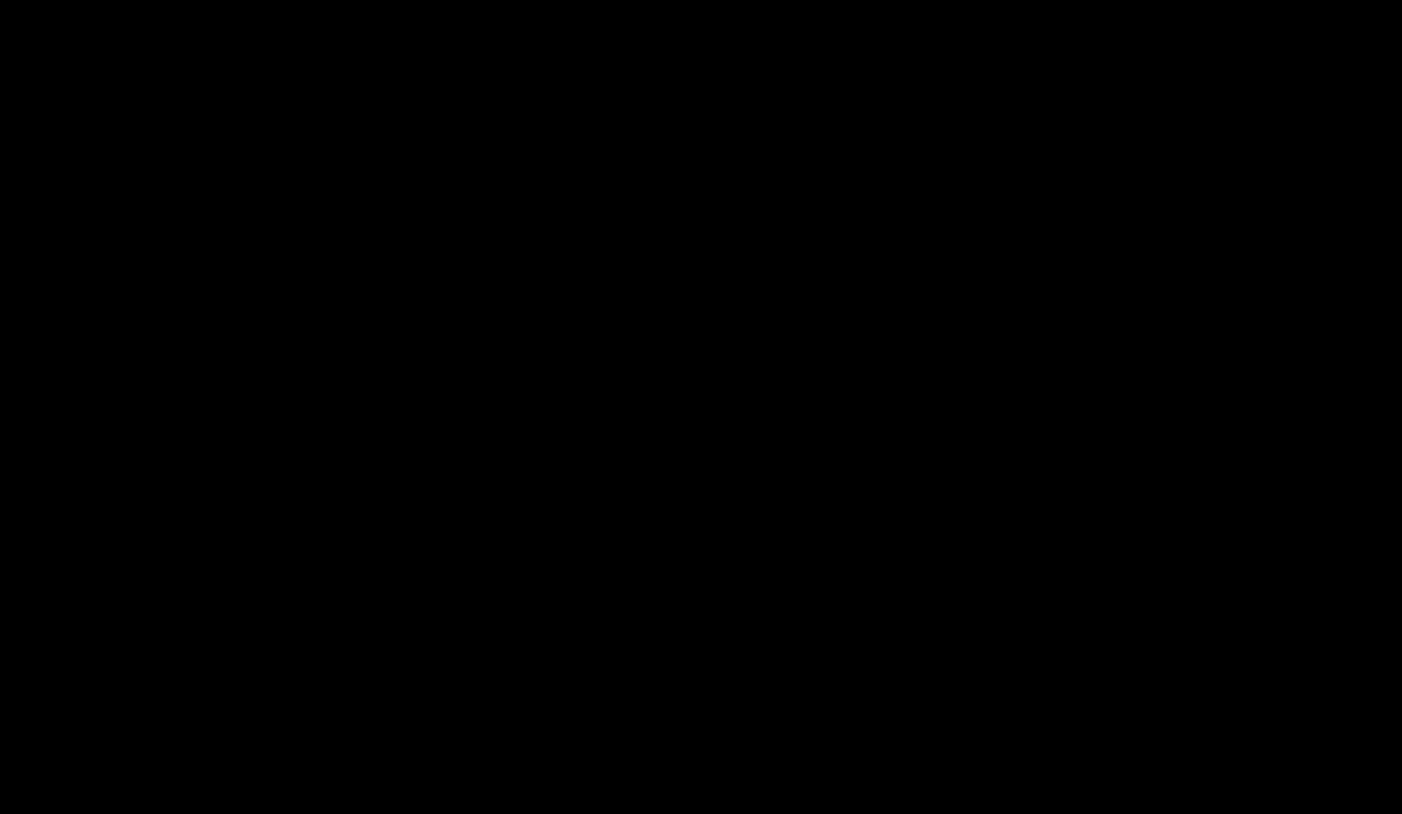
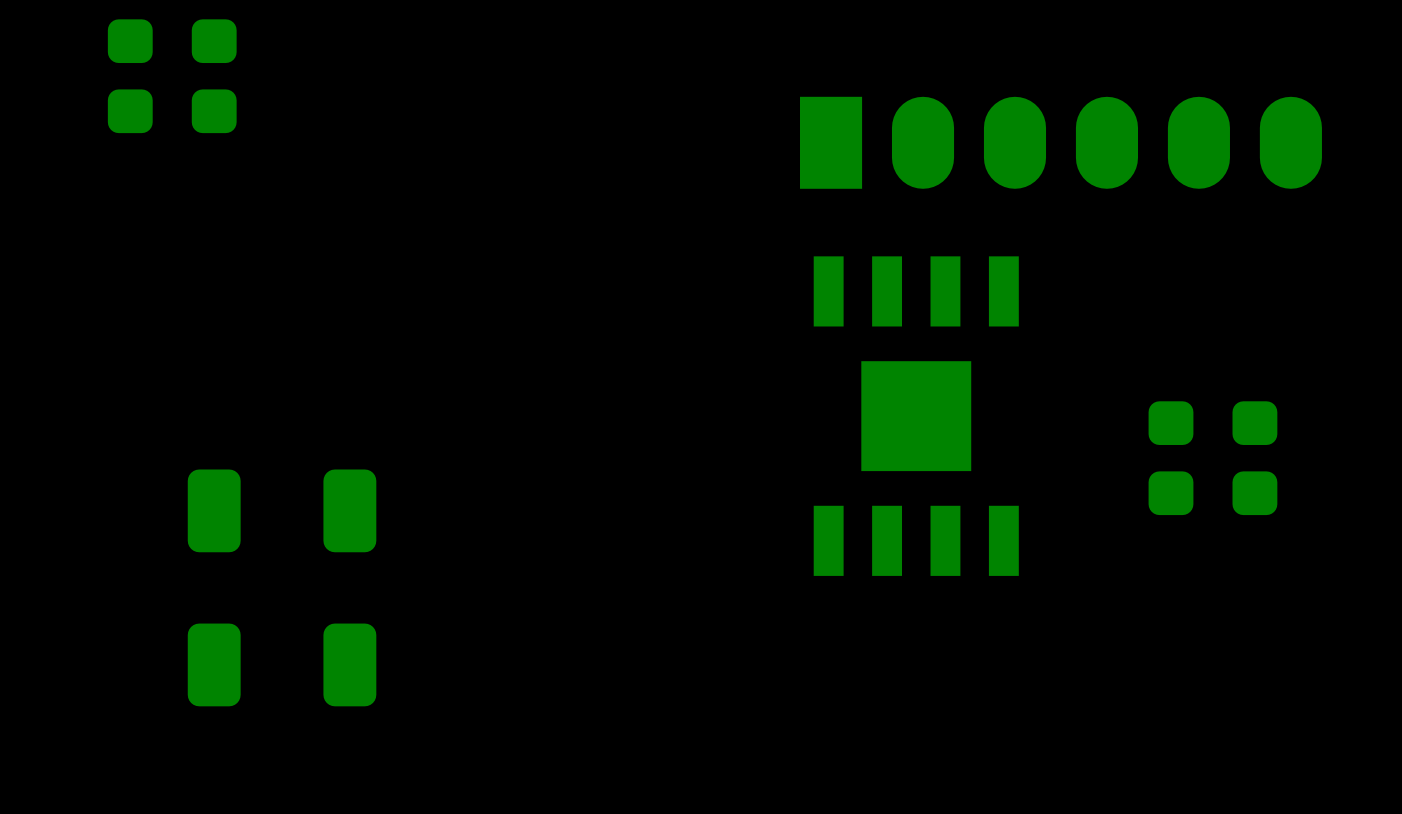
part: none -> (172, 41)
part: none -> (172, 111)
part: none -> (1060, 142)
part: none -> (916, 416)
part: none -> (1212, 423)
part: none -> (1212, 493)
part: none -> (282, 510)
part: none -> (282, 664)

